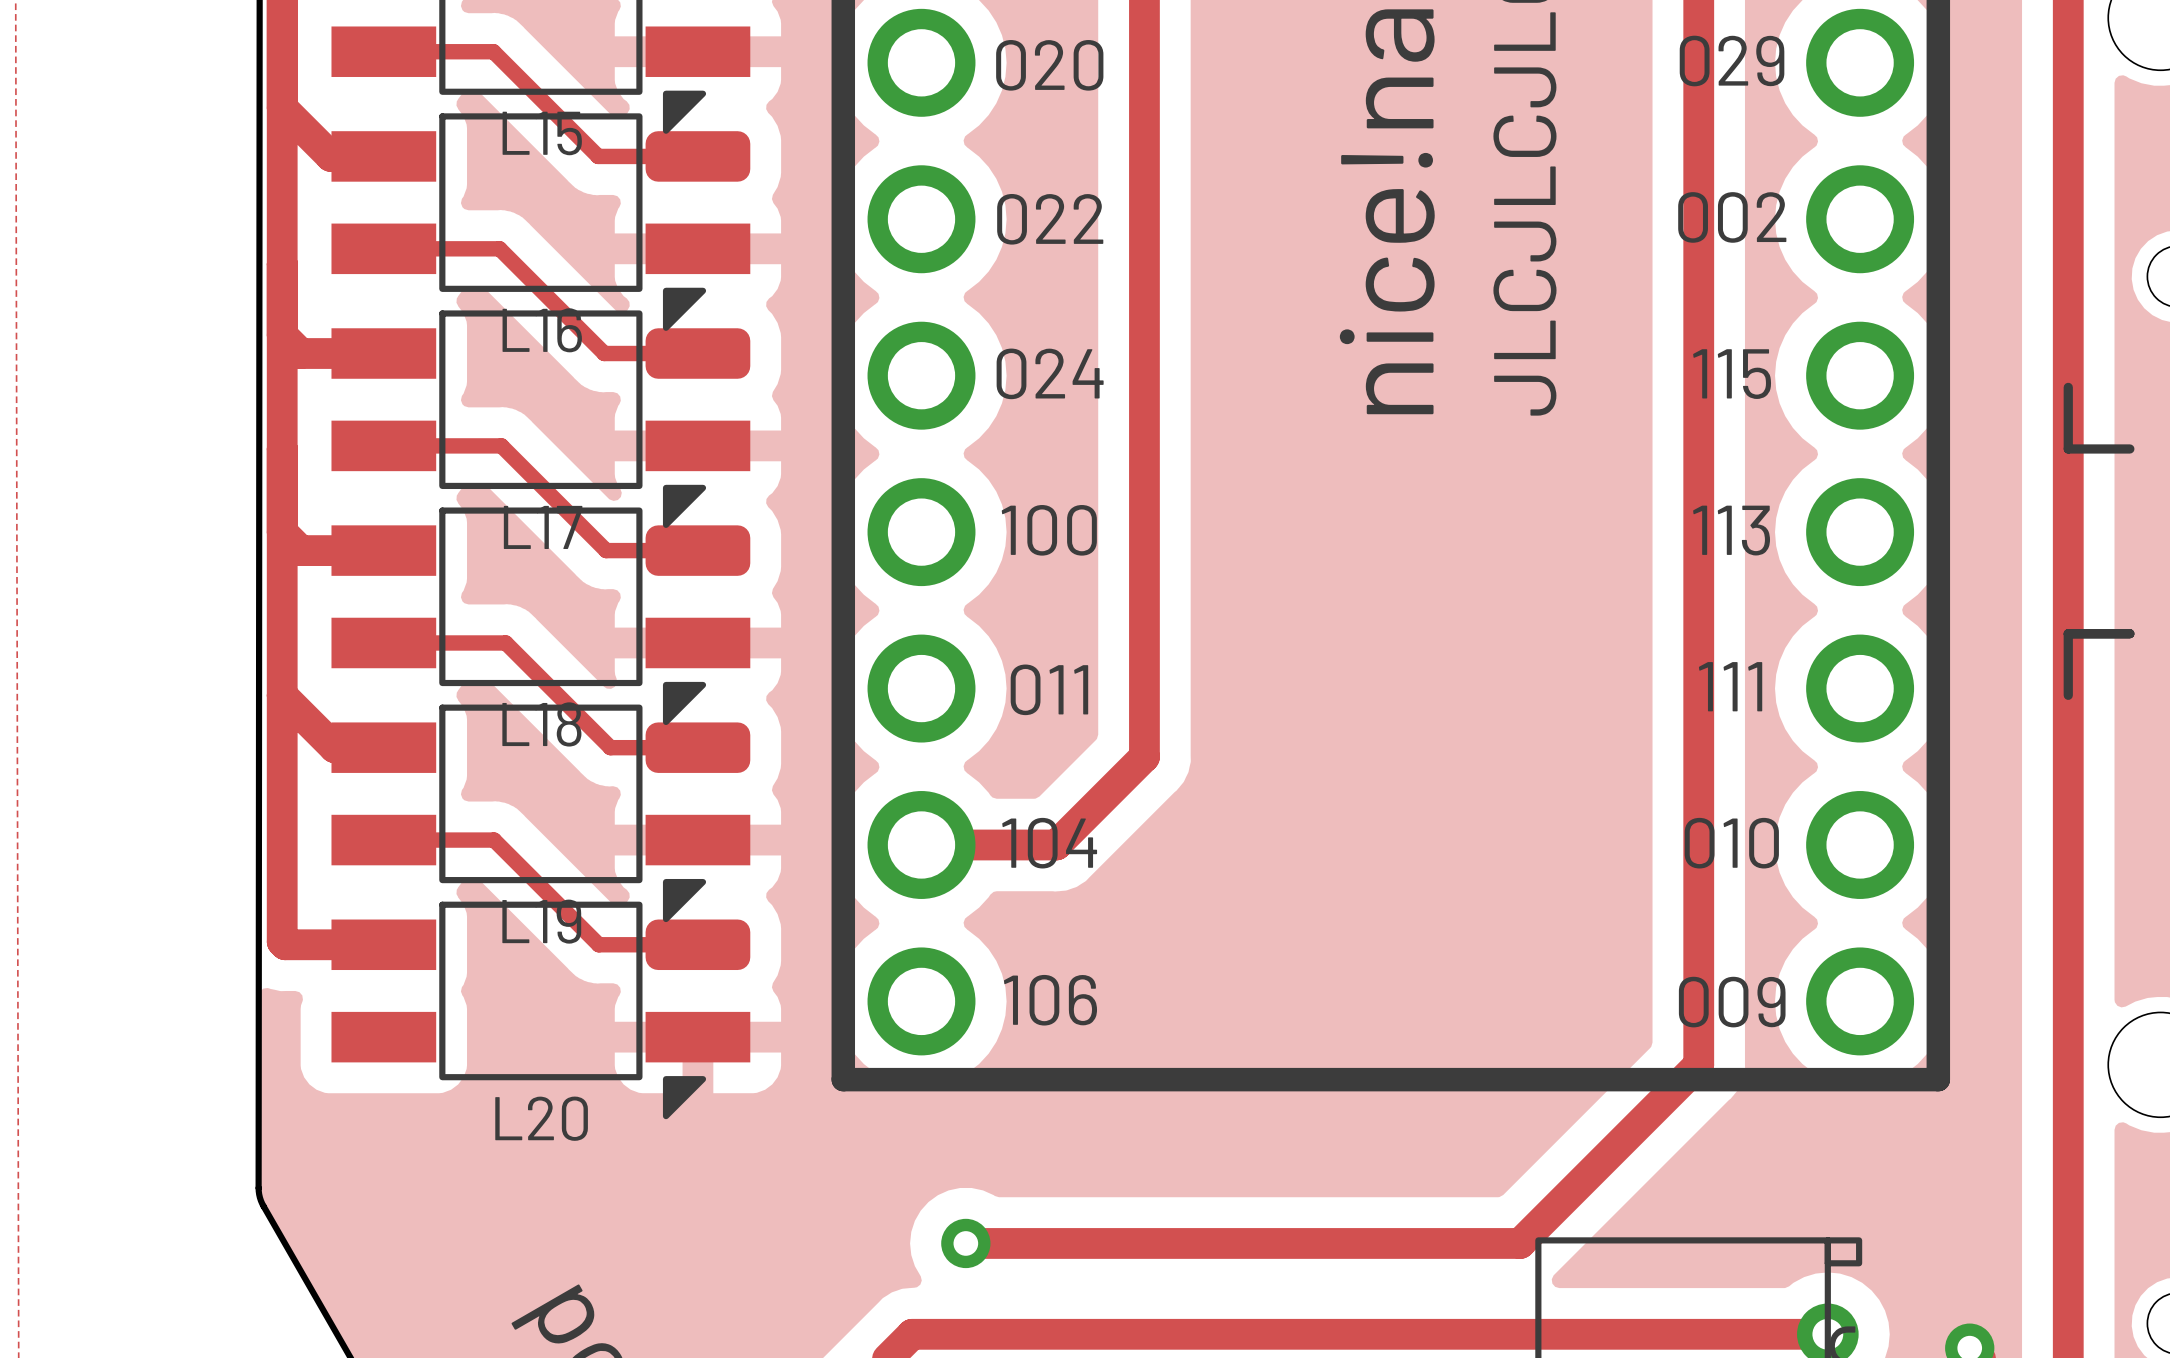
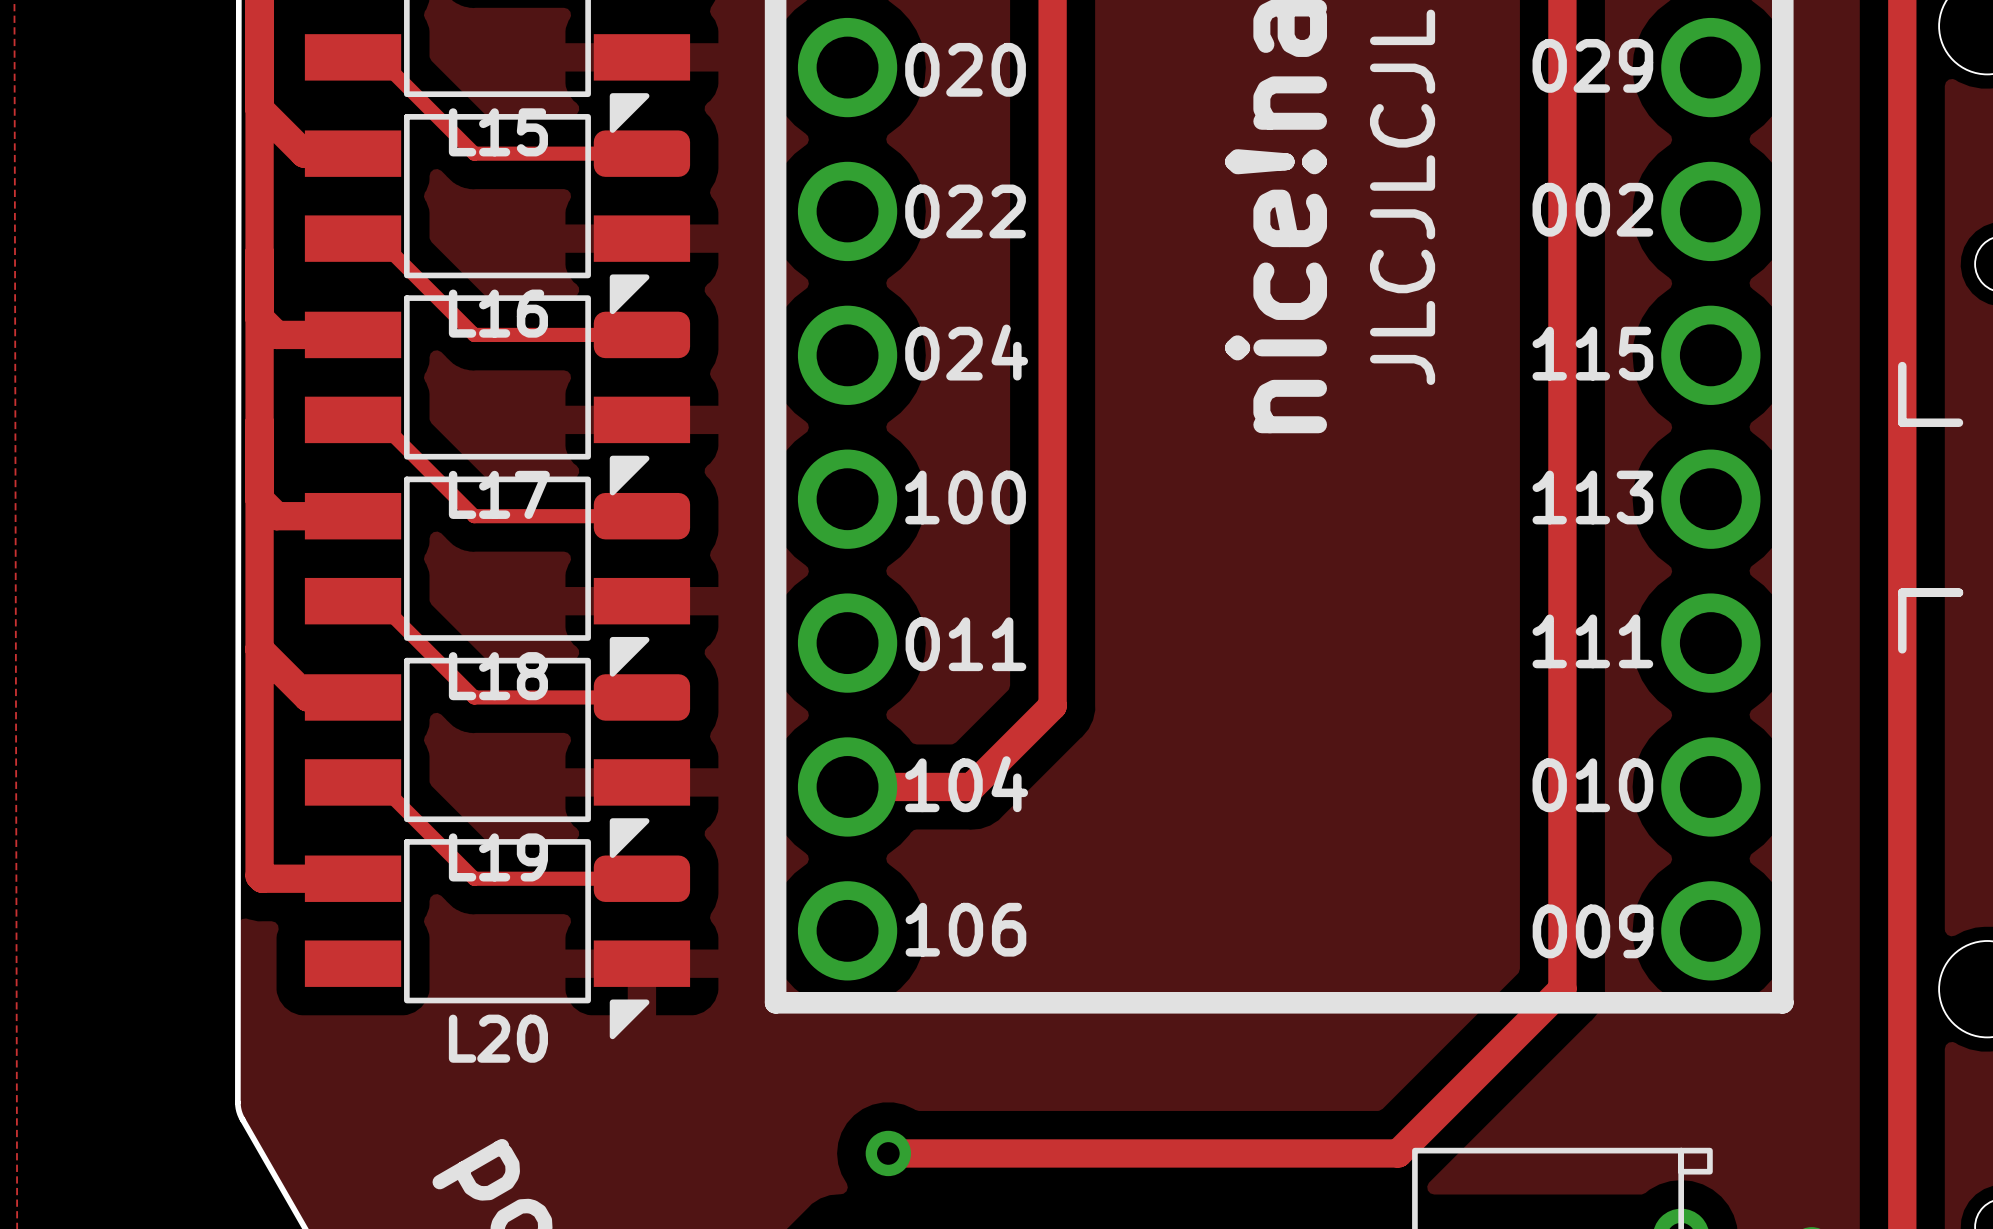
track: (410, 51) (493, 51) (598, 156) -> (377, 57) (474, 153) (550, 153)
track: (410, 248) (499, 248) (604, 353) -> (377, 238) (474, 334) (555, 334)
track: (410, 445) (501, 445) (606, 550) -> (377, 419) (474, 516) (557, 516)
track: (410, 642) (505, 642) (610, 747) -> (377, 601) (474, 697) (561, 697)
track: (410, 840) (494, 840) (598, 944) -> (377, 782) (474, 878) (550, 878)

